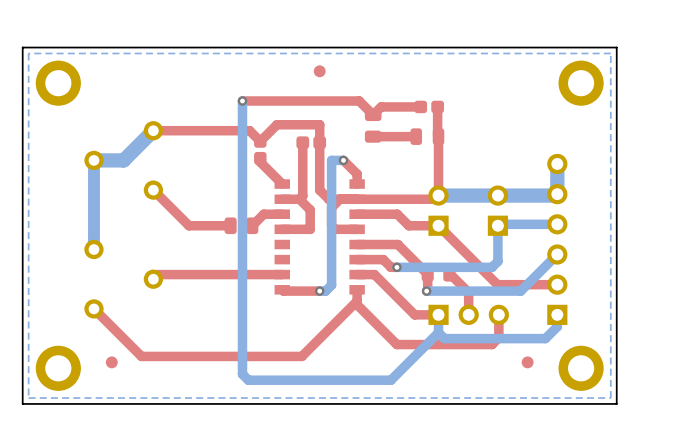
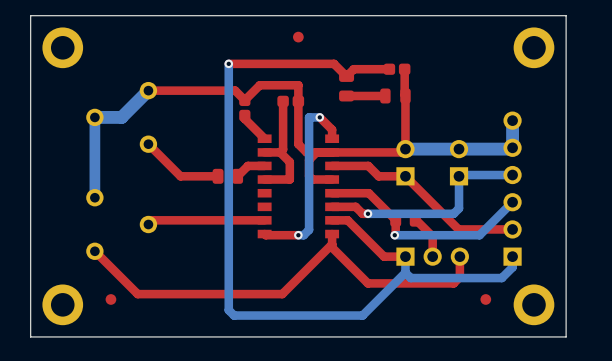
bottom zone outline: (610, 53) (610, 398) (28, 398) (28, 53) (610, 53) -> none

